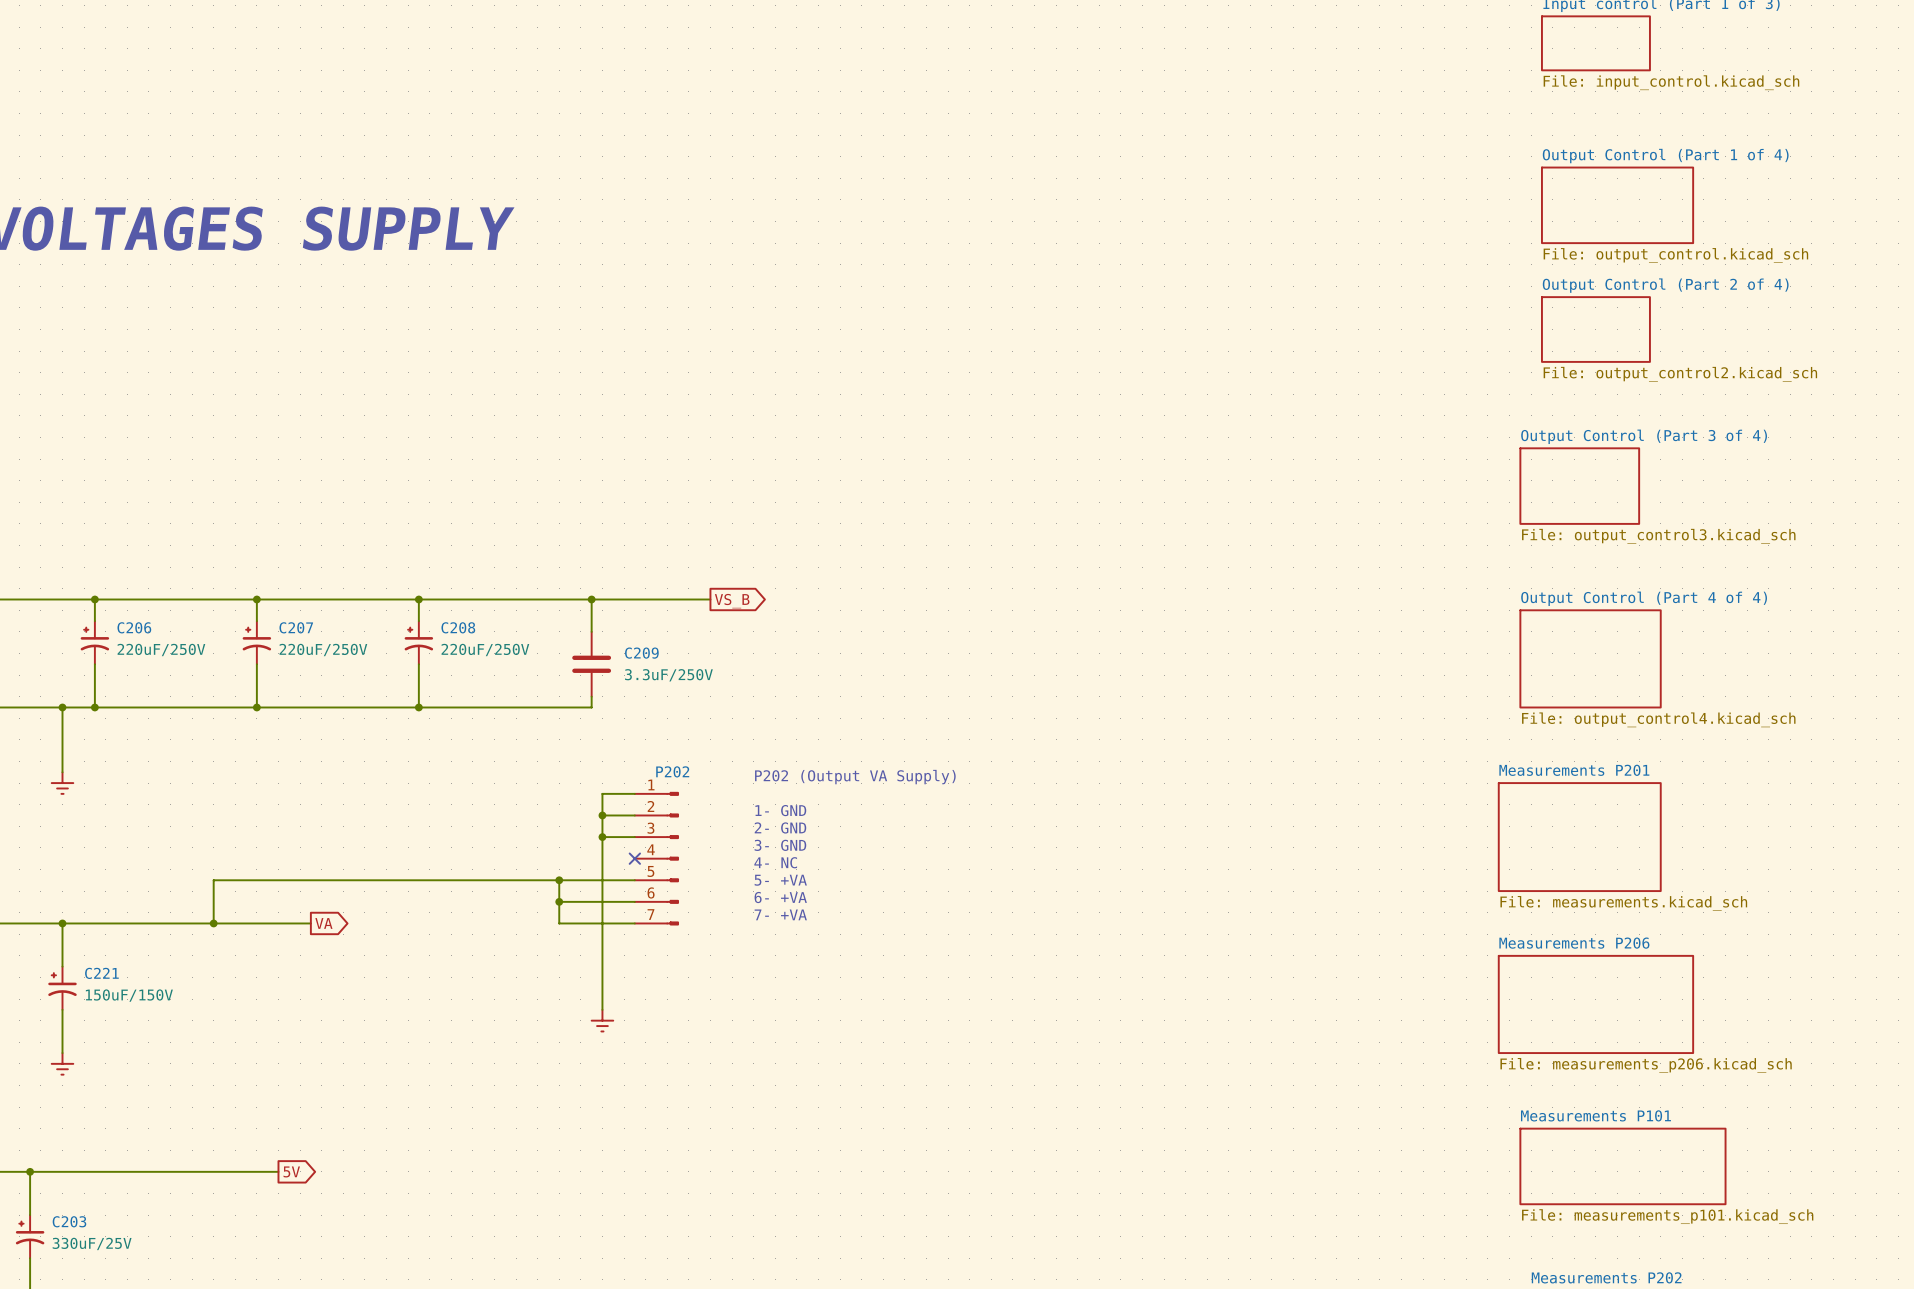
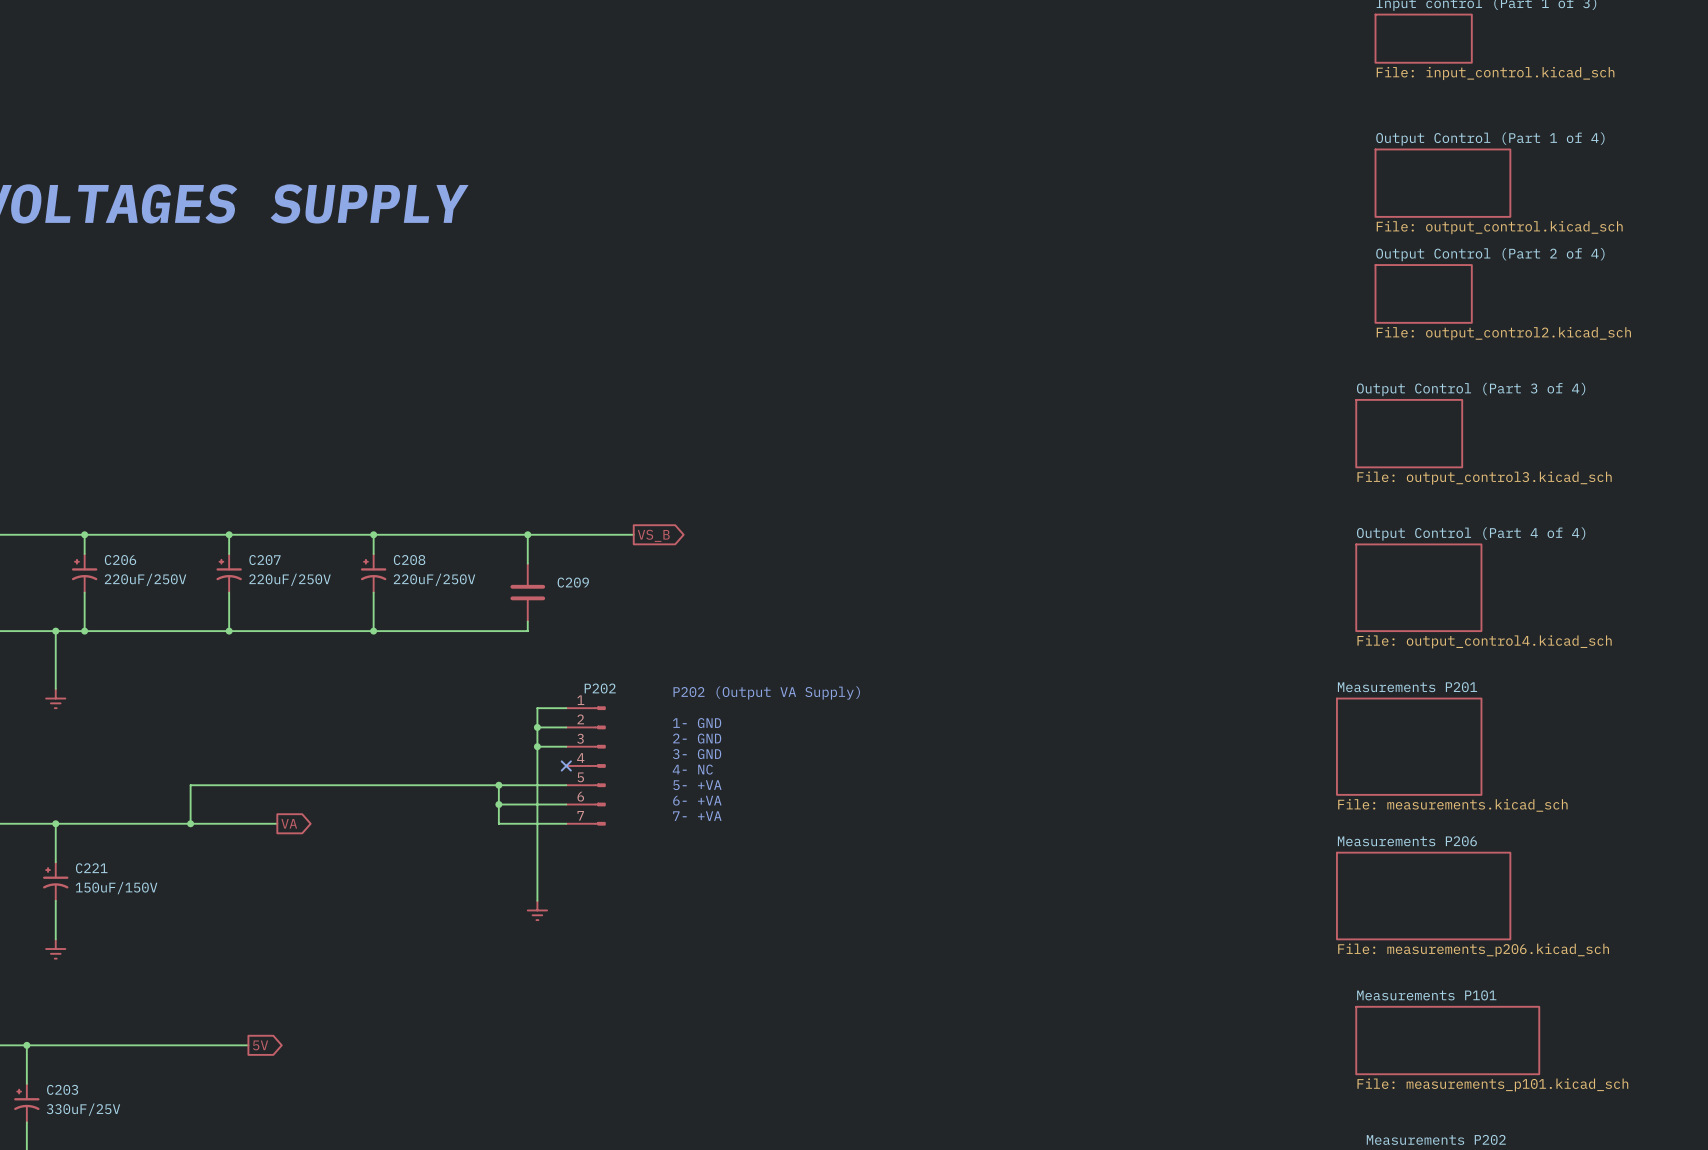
C209 value: 3.3uF/250V (668, 675) -> none

